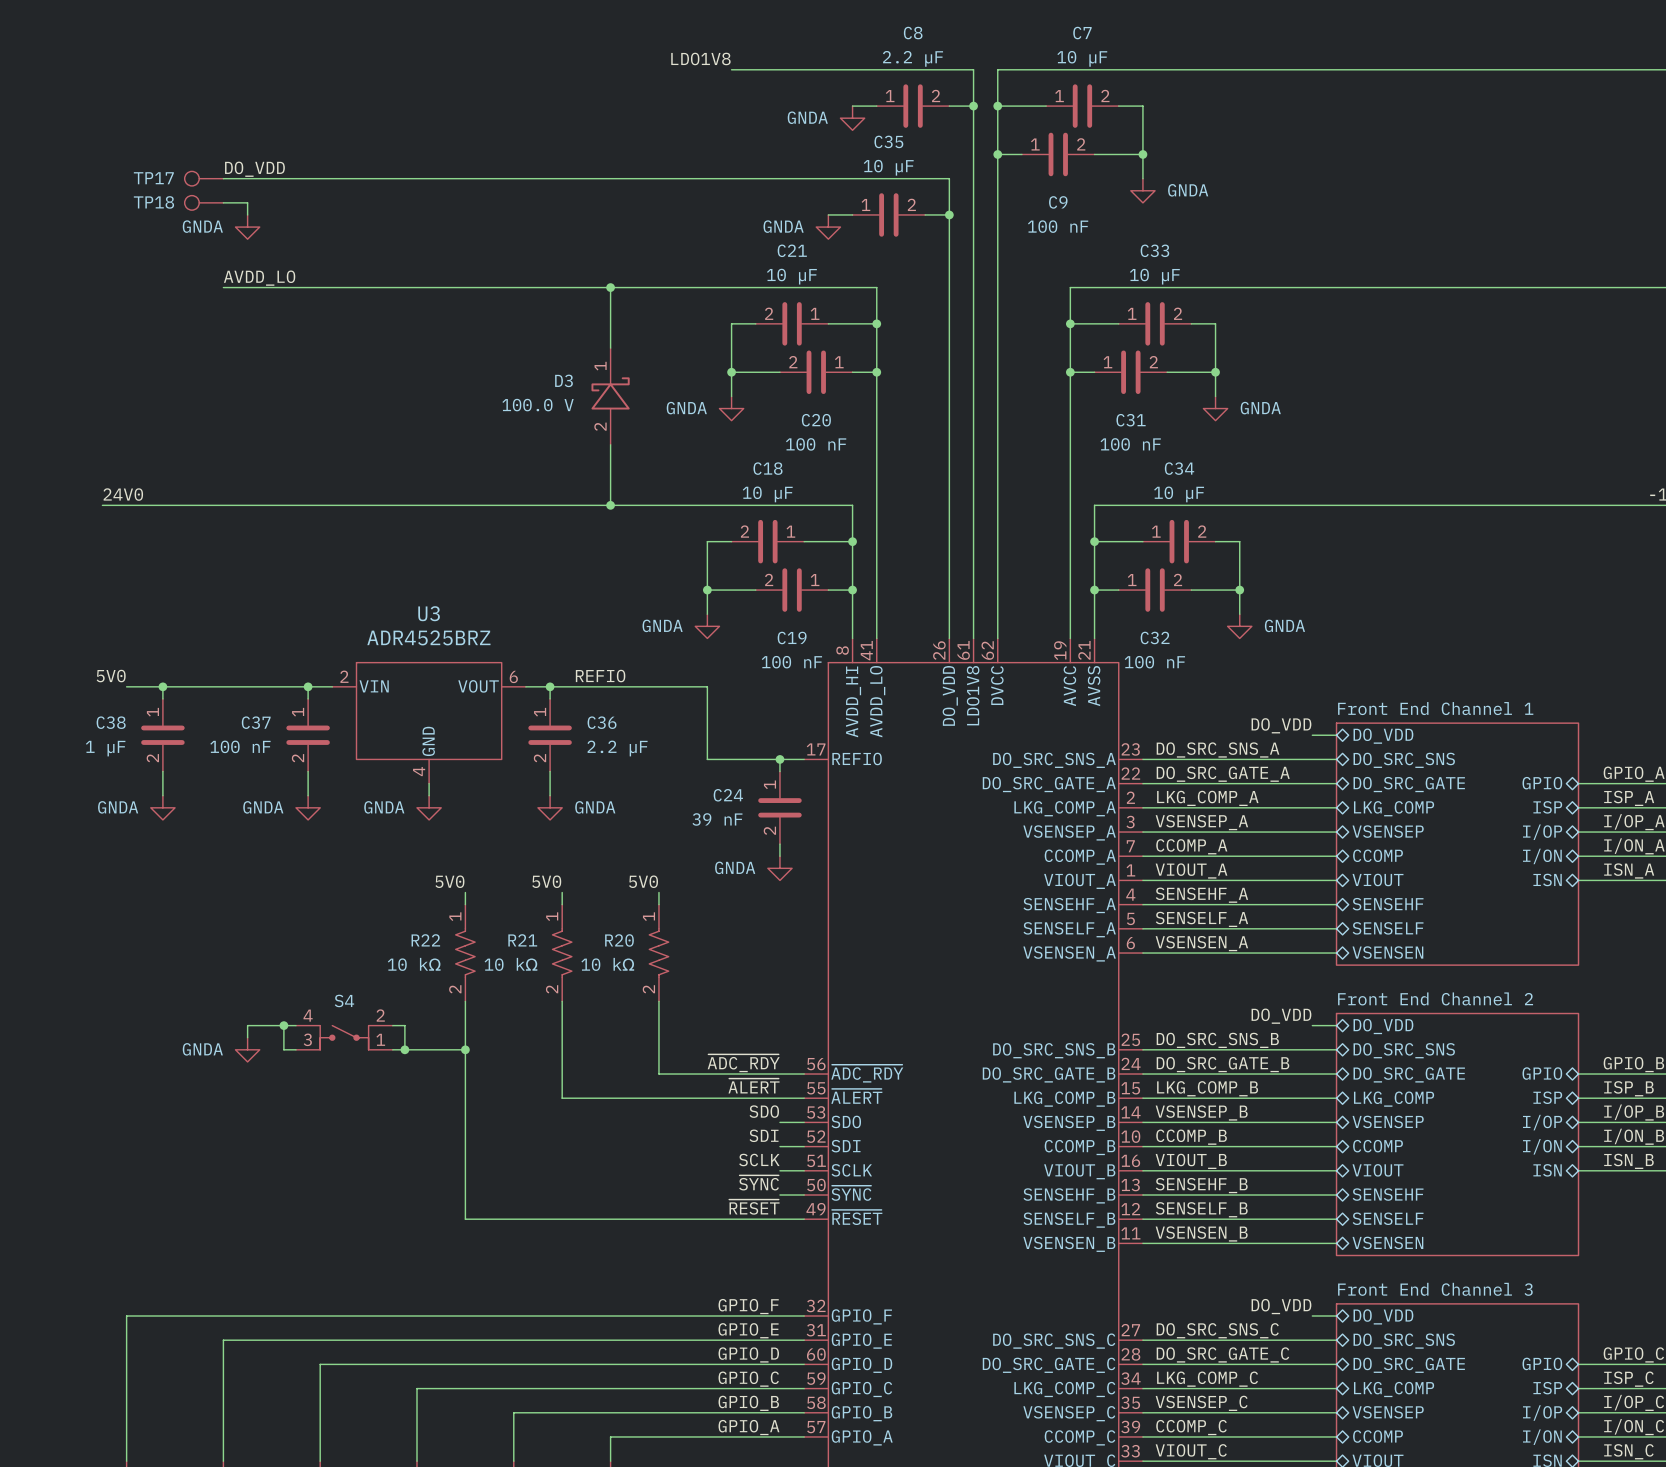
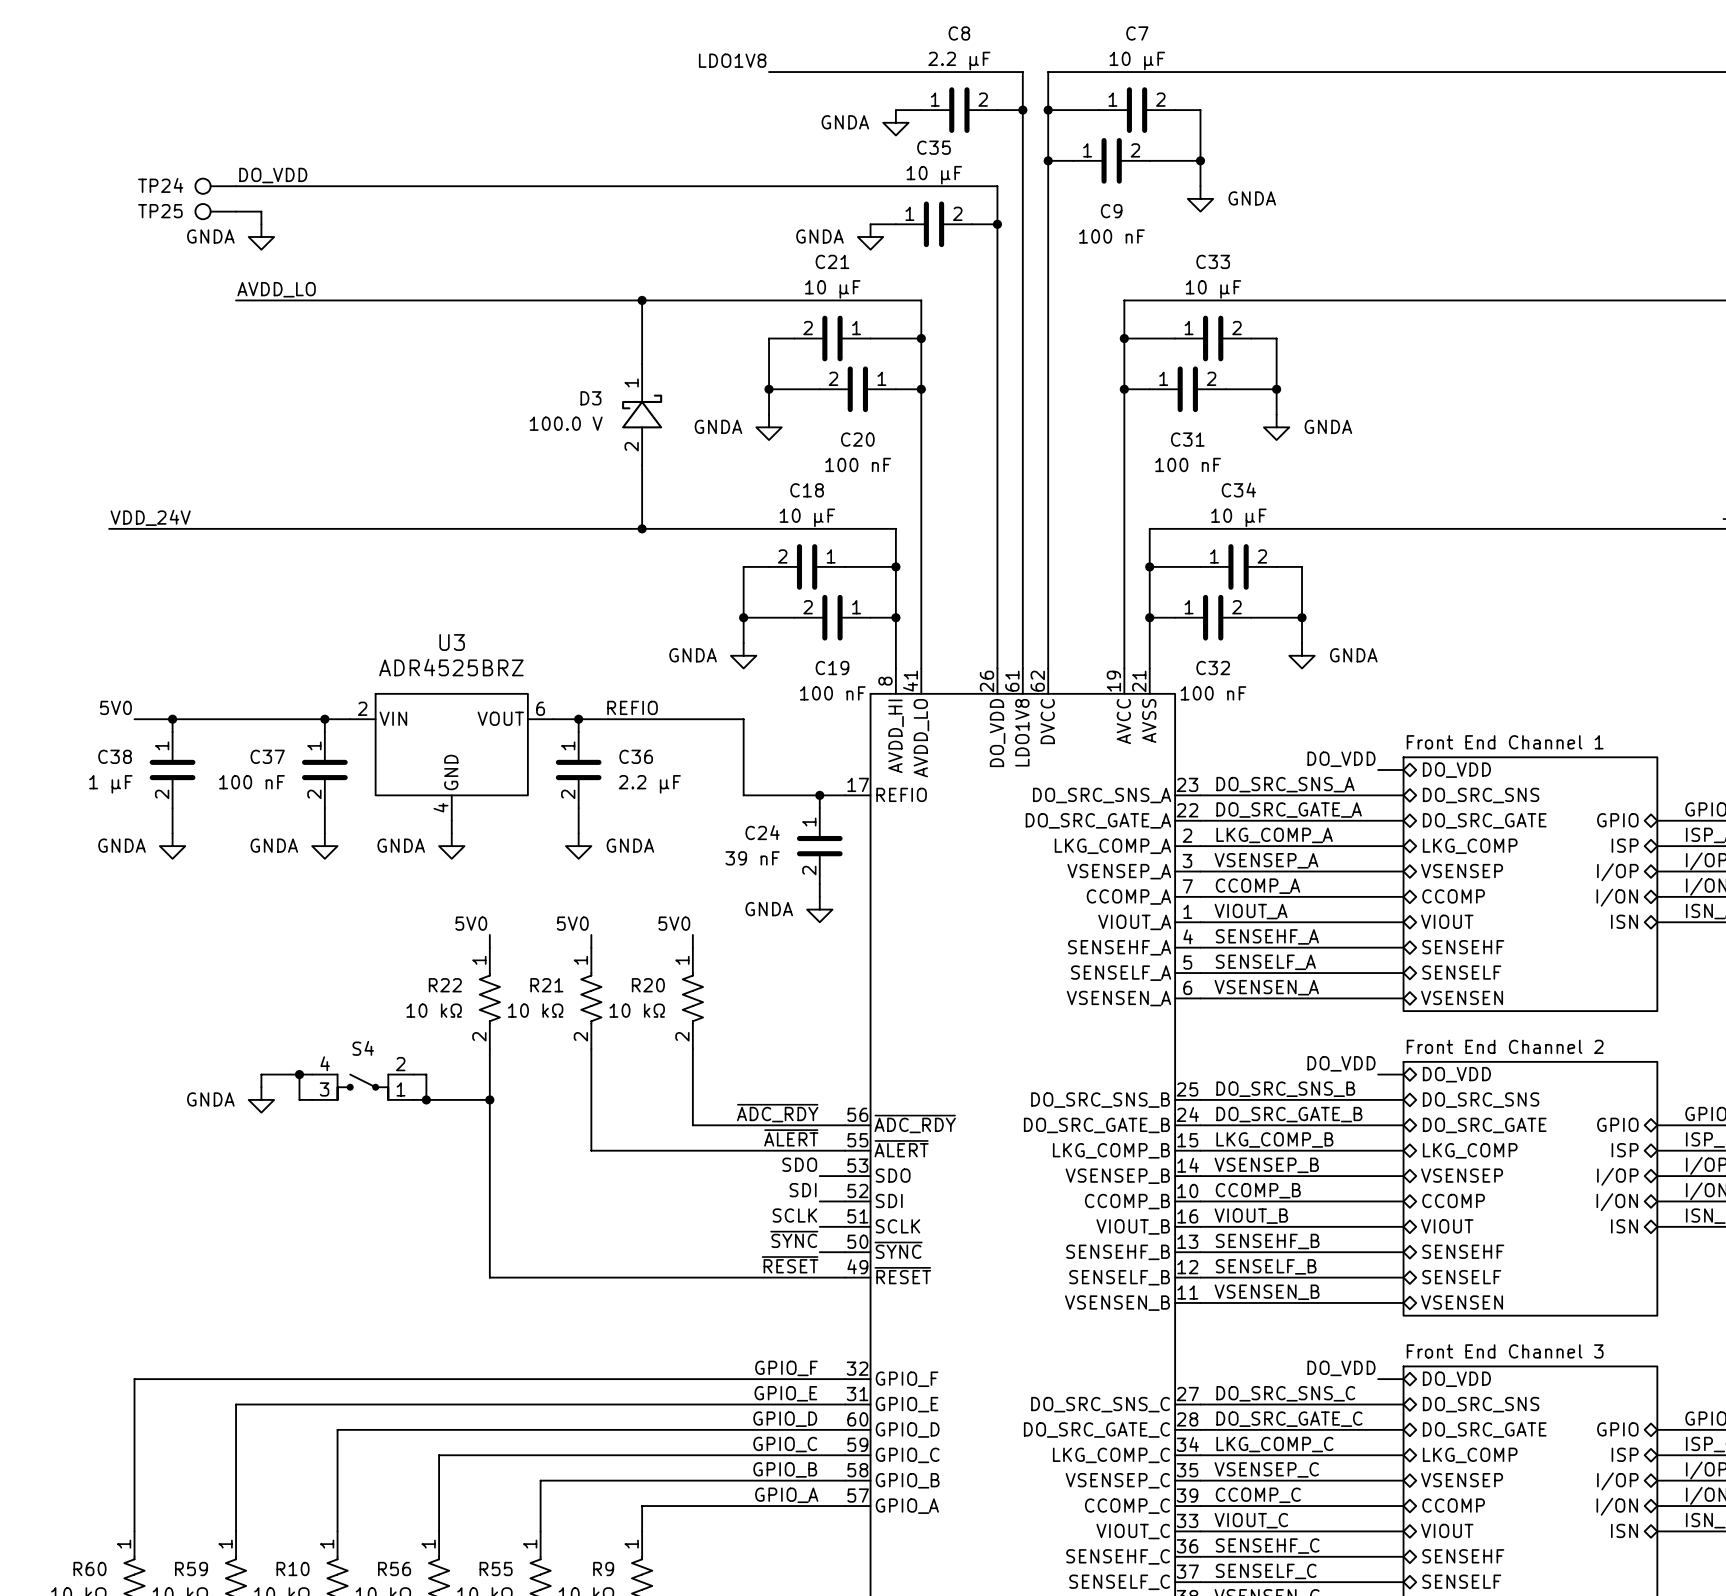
TP17 name: TP17 (153, 178) -> TP24 (160, 185)
TP18 name: TP18 (153, 202) -> TP25 (160, 211)
label: 24V0 (123, 494) -> VDD_24V (150, 517)

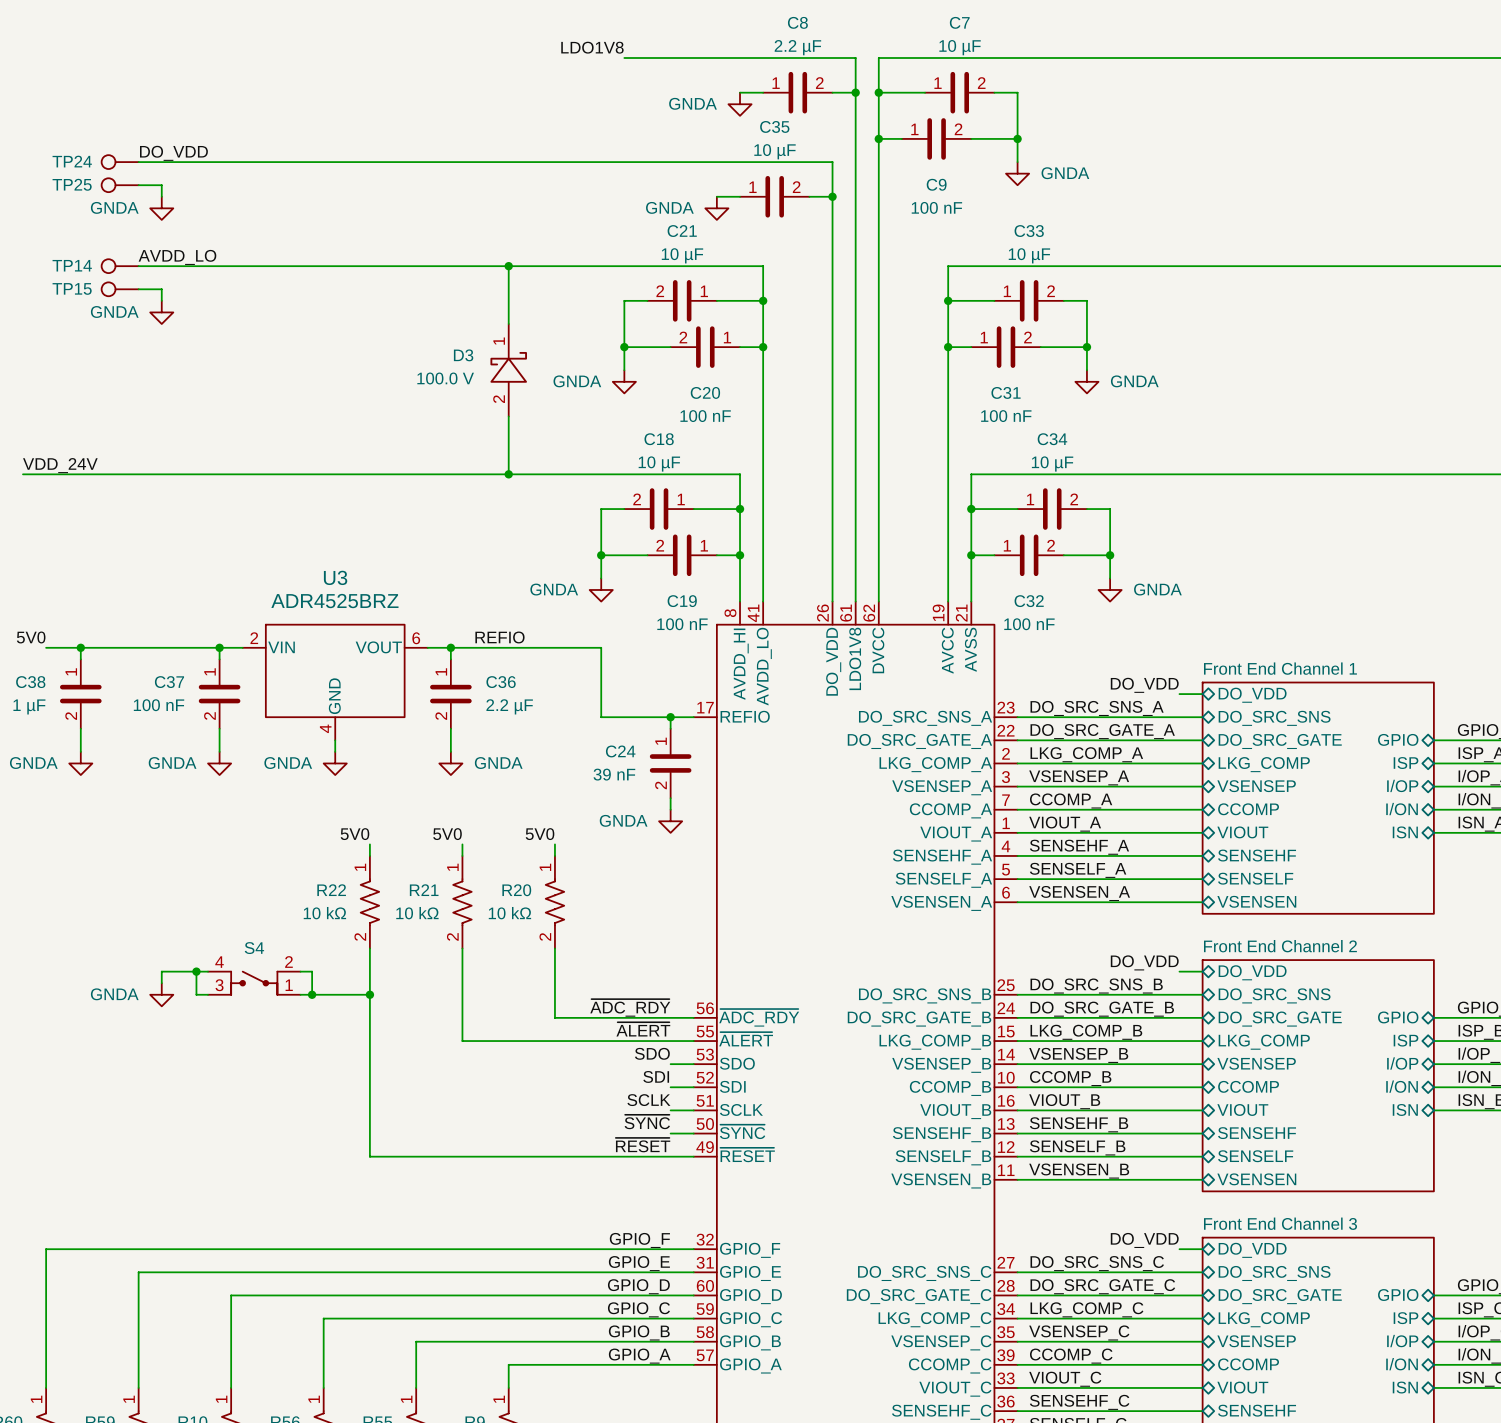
TP14: none -> (120, 266)
TP15: none -> (120, 289)
wire: none -> (138, 289) (161, 289) (161, 300)
power symbol: none -> GNDA (161, 312)

